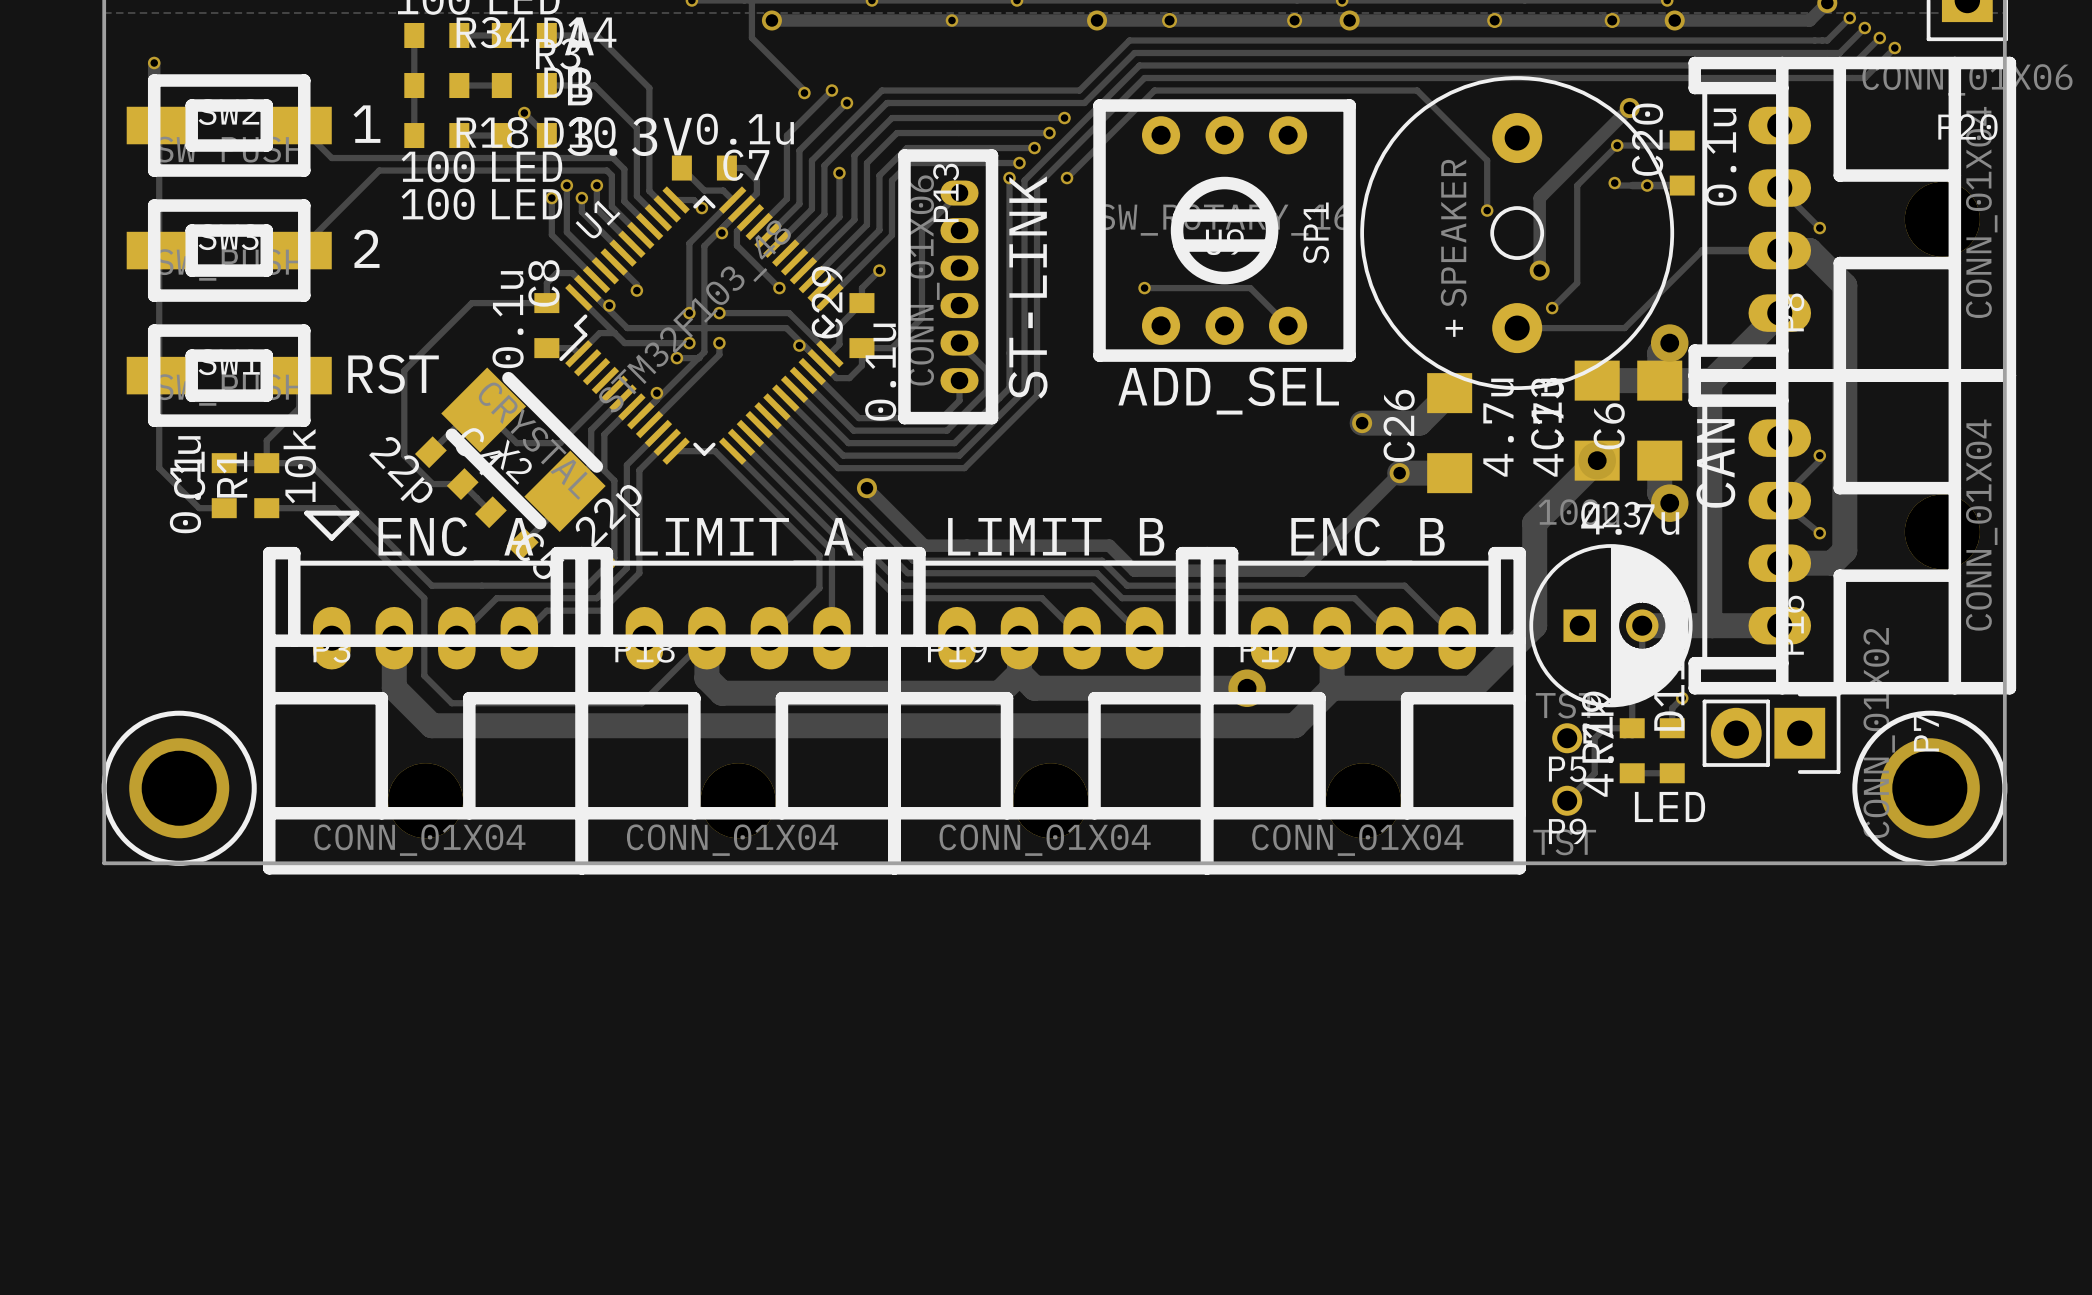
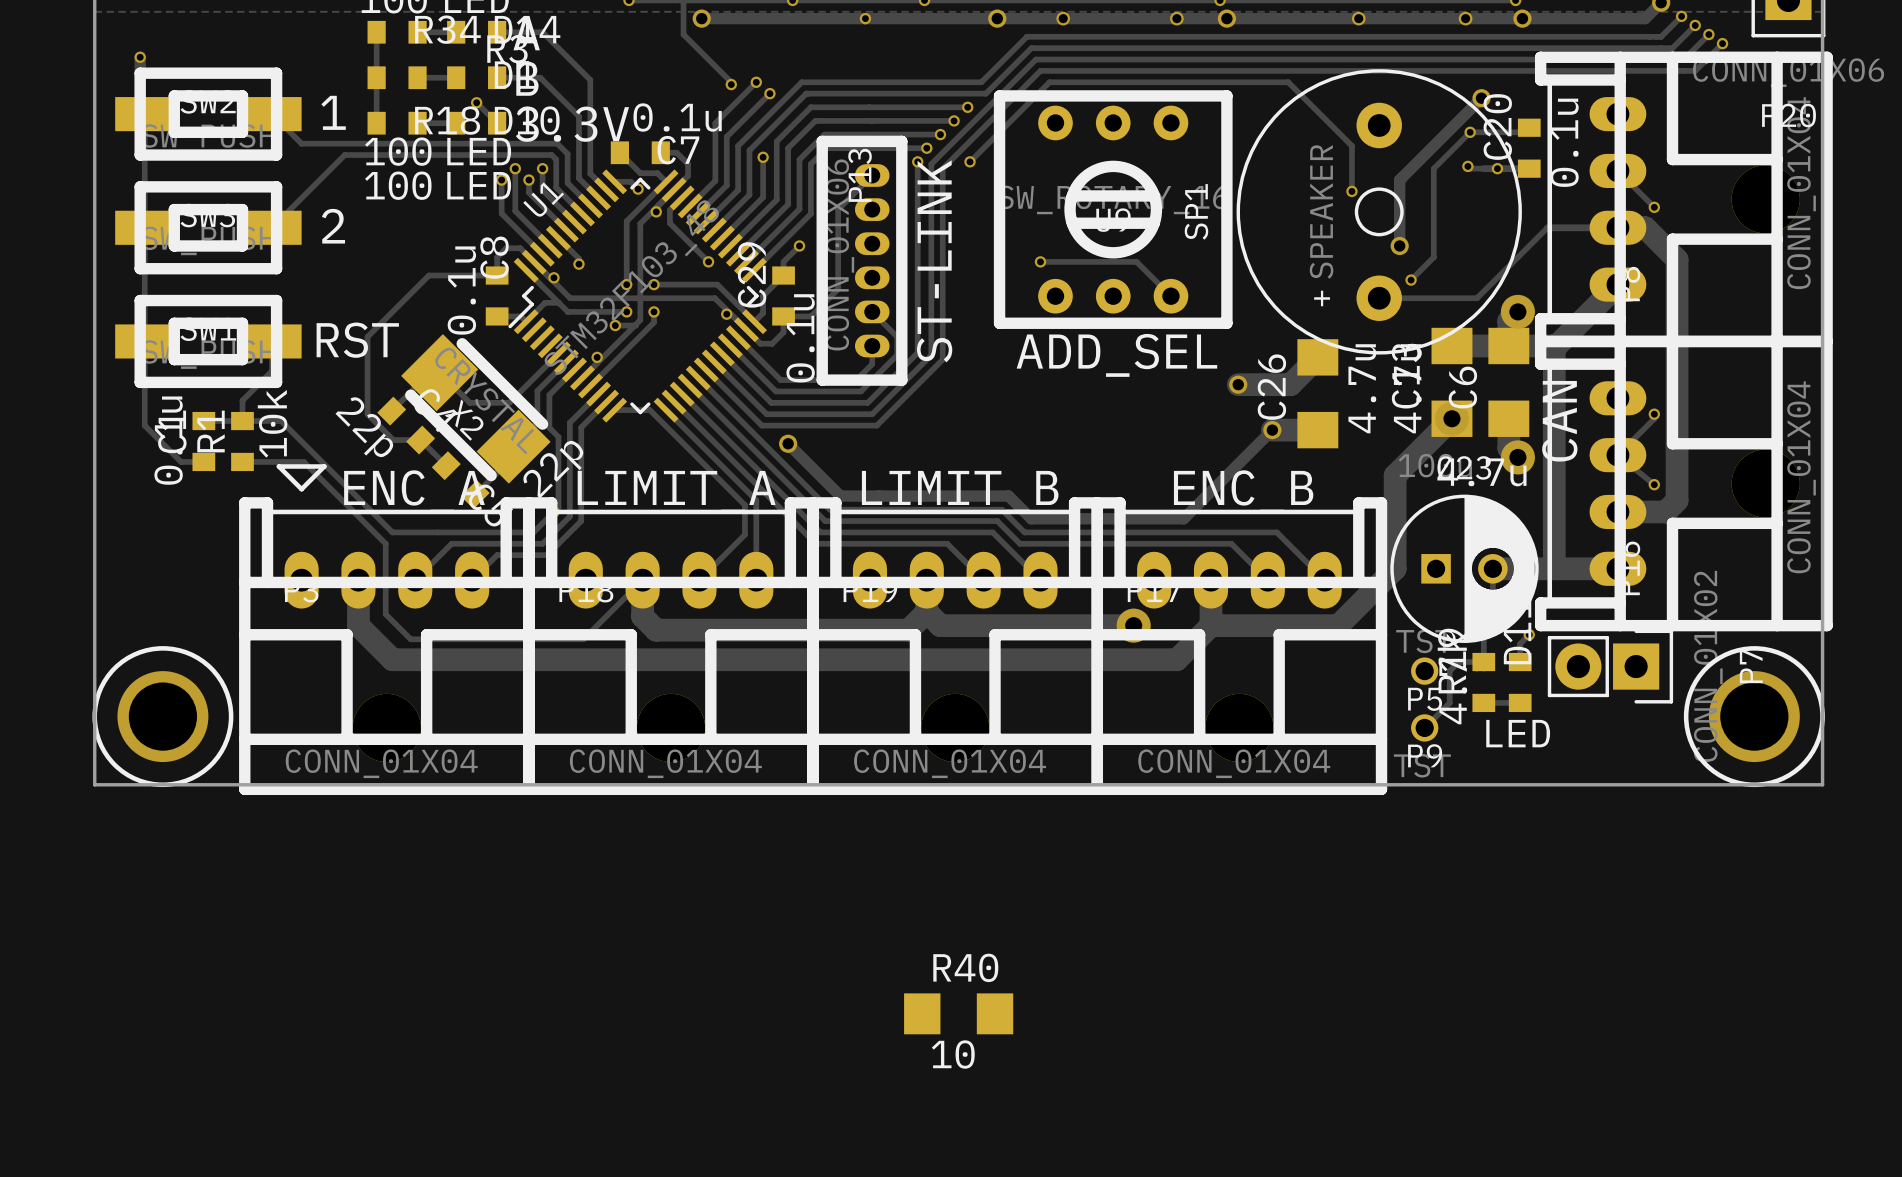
R40: none -> 10 (958, 1013)

